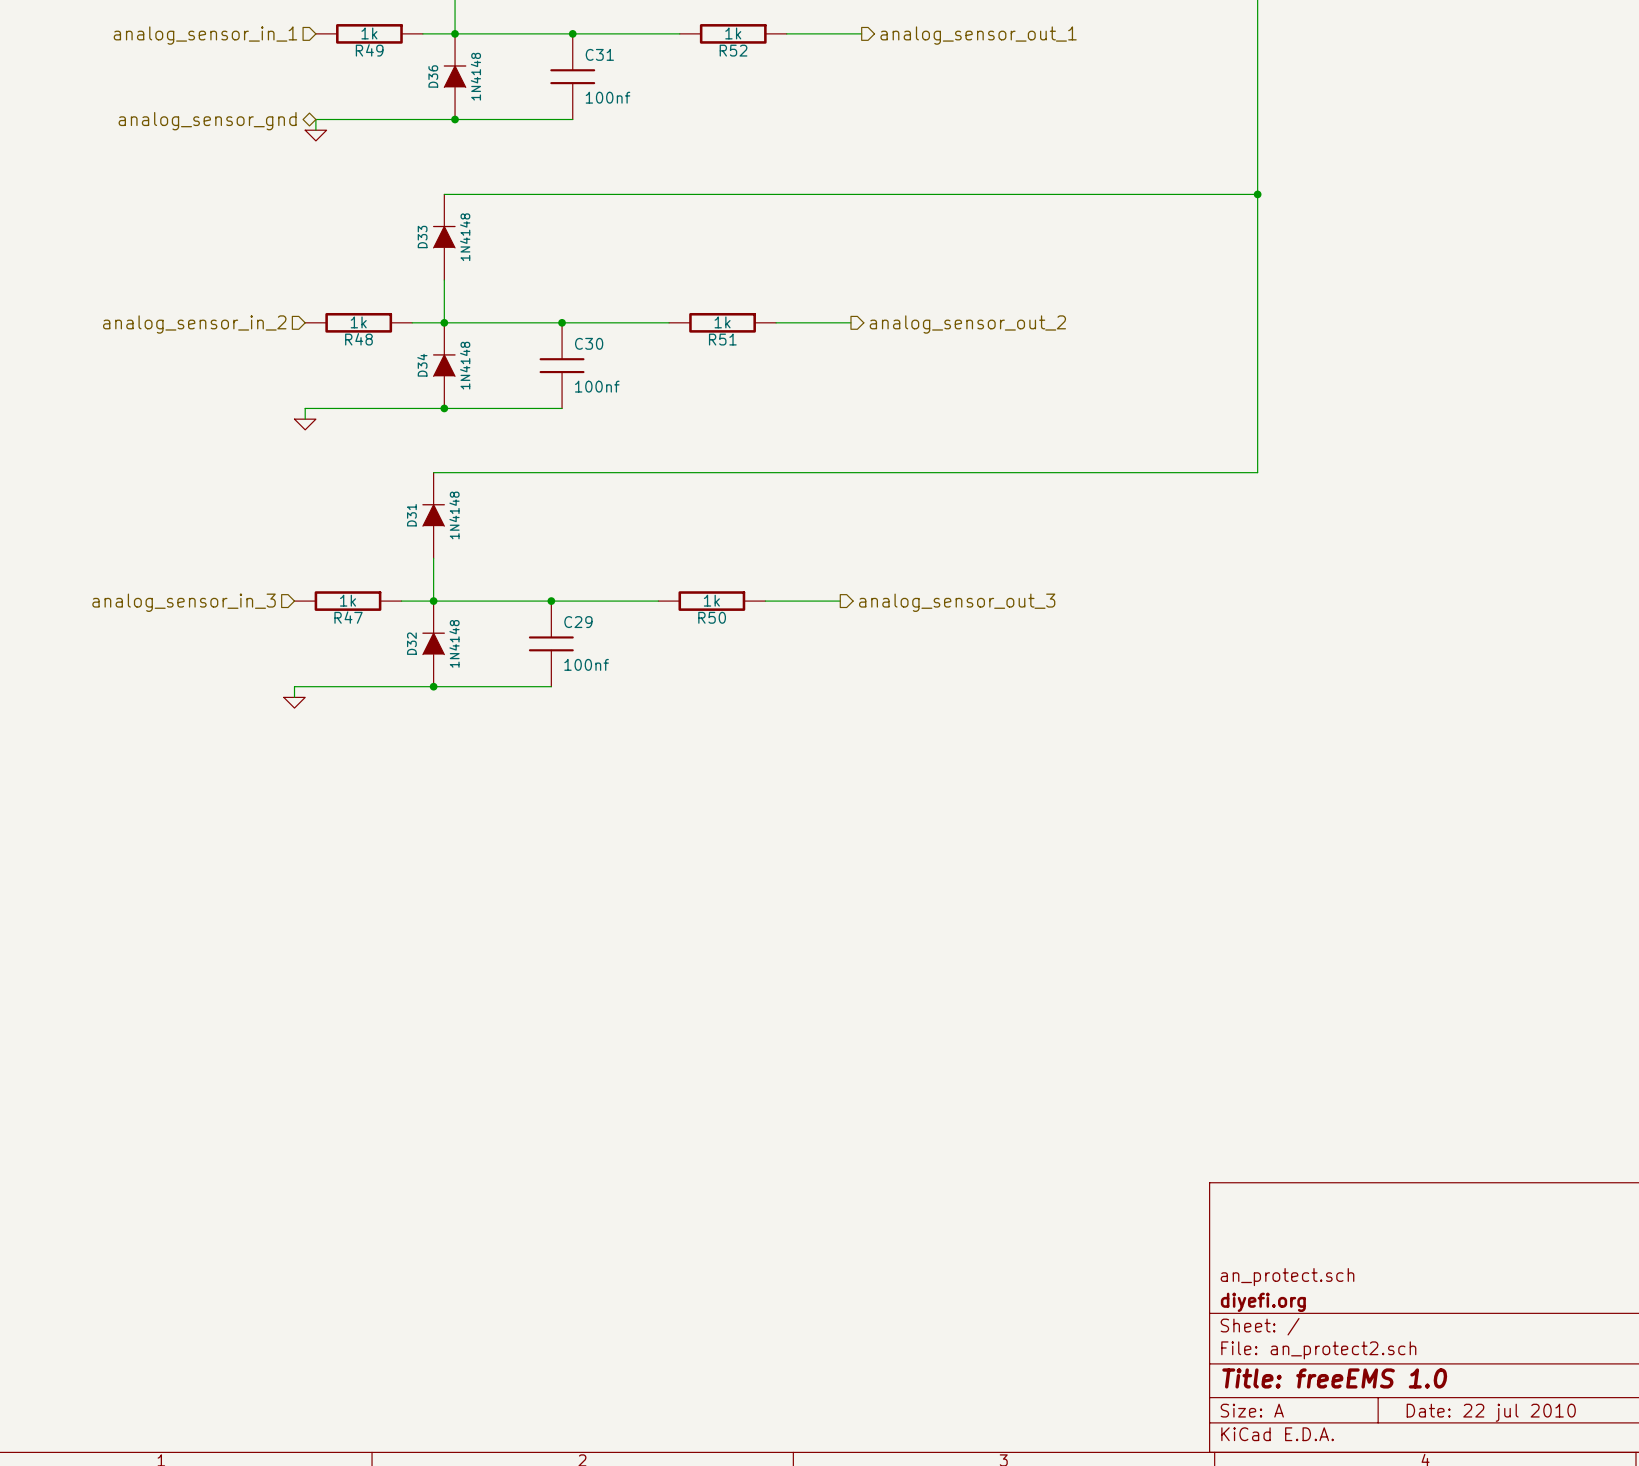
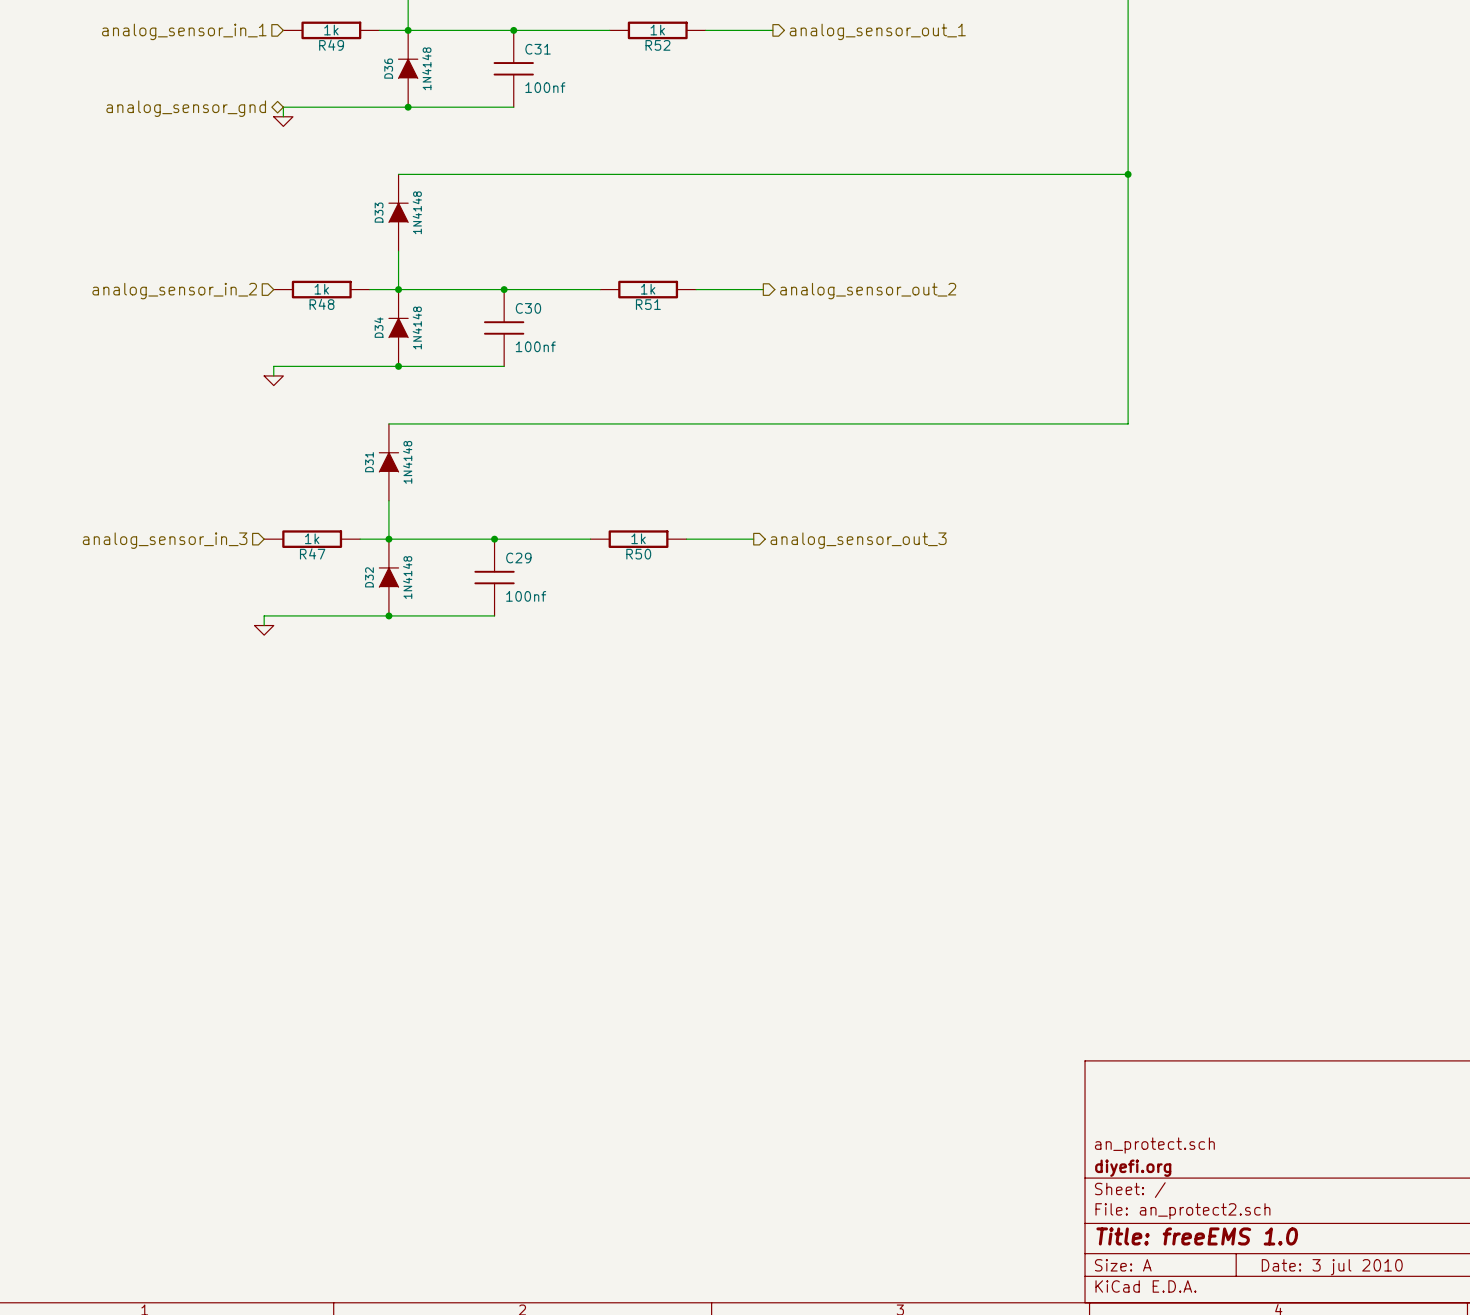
title block: Date: 22 jul 2010 (1491, 1412) -> Date: 3 jul 2010 (1332, 1267)

